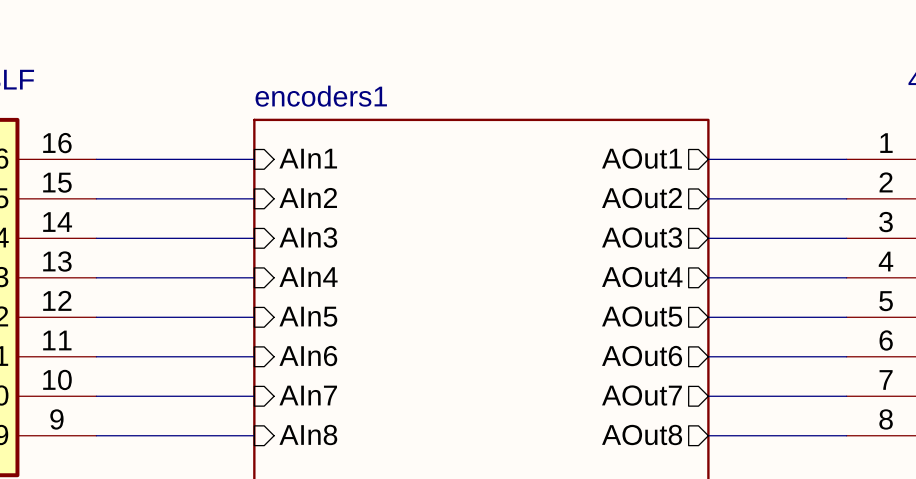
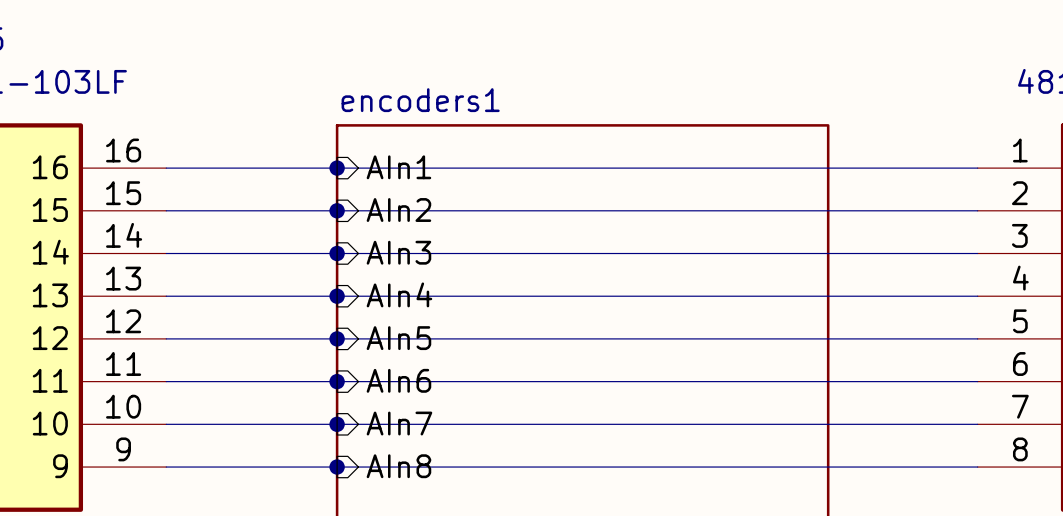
sheet pin: AOut1 (641, 158) -> none
wire: none -> (337, 168) (828, 168)
junction: none -> (337, 168)
wire: none -> (337, 210) (828, 210)
junction: none -> (337, 210)
sheet pin: AOut2 (641, 198) -> none
sheet pin: AOut3 (642, 237) -> none
wire: none -> (337, 253) (828, 253)
junction: none -> (337, 253)
wire: none -> (337, 296) (828, 296)
junction: none -> (337, 296)
sheet pin: AOut4 (642, 277) -> none
sheet pin: AOut5 (642, 316) -> none
wire: none -> (337, 338) (828, 338)
junction: none -> (337, 338)
wire: none -> (337, 381) (828, 381)
junction: none -> (337, 381)
sheet pin: AOut6 (642, 356) -> none
sheet pin: AOut7 (641, 395) -> none
wire: none -> (337, 424) (828, 424)
junction: none -> (337, 424)
wire: none -> (337, 467) (828, 467)
junction: none -> (337, 467)
sheet pin: AOut8 (642, 435) -> none

